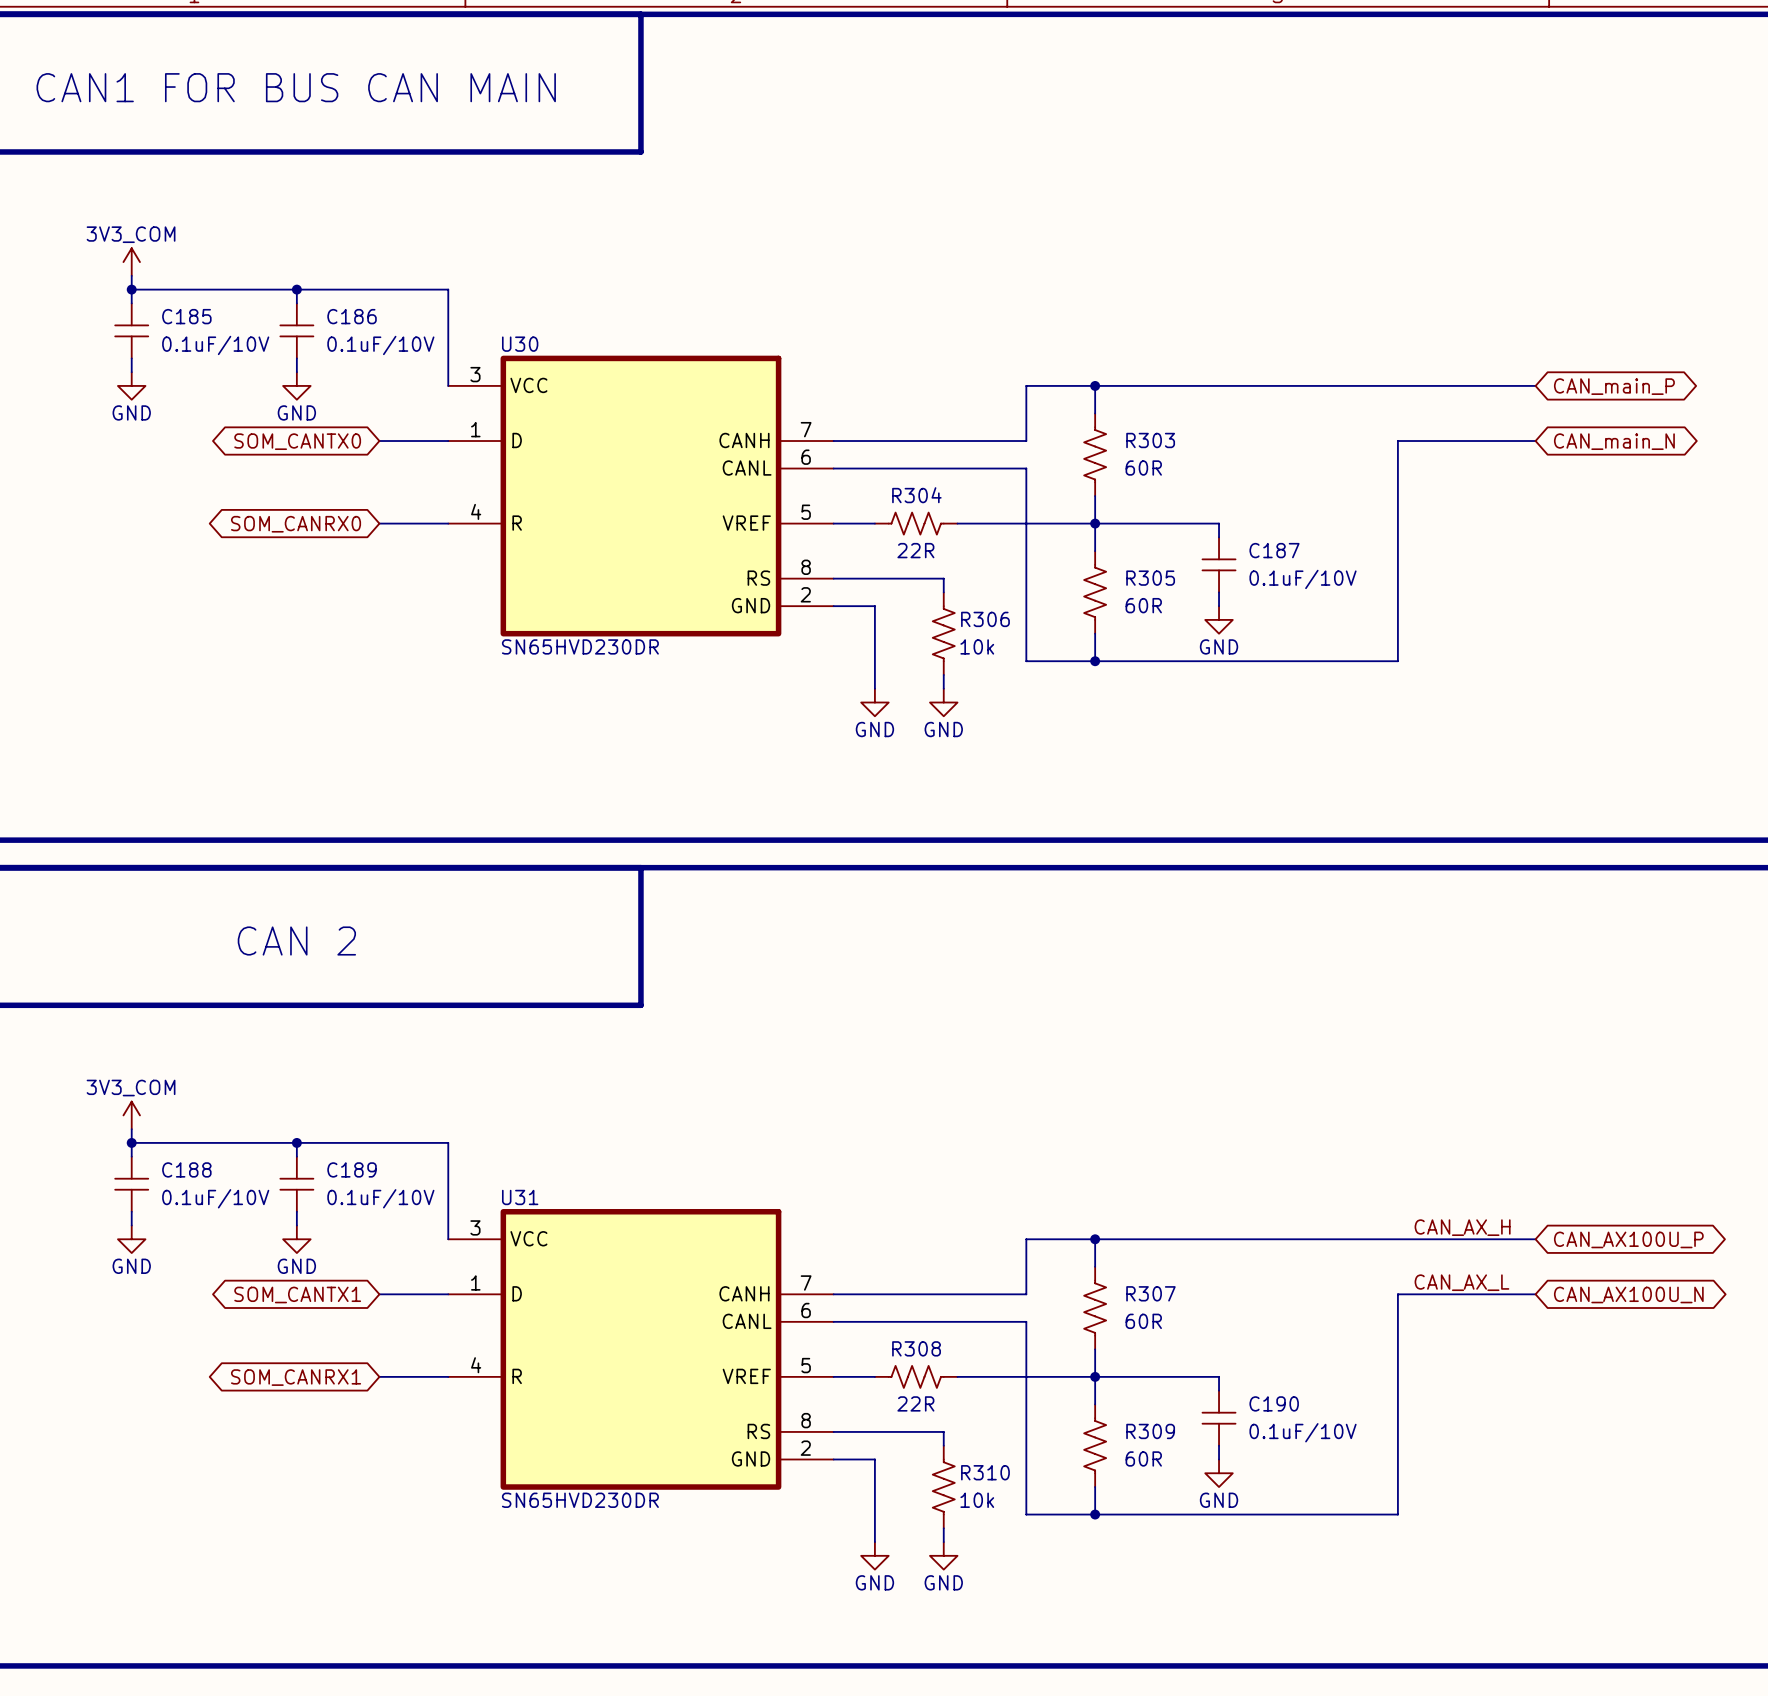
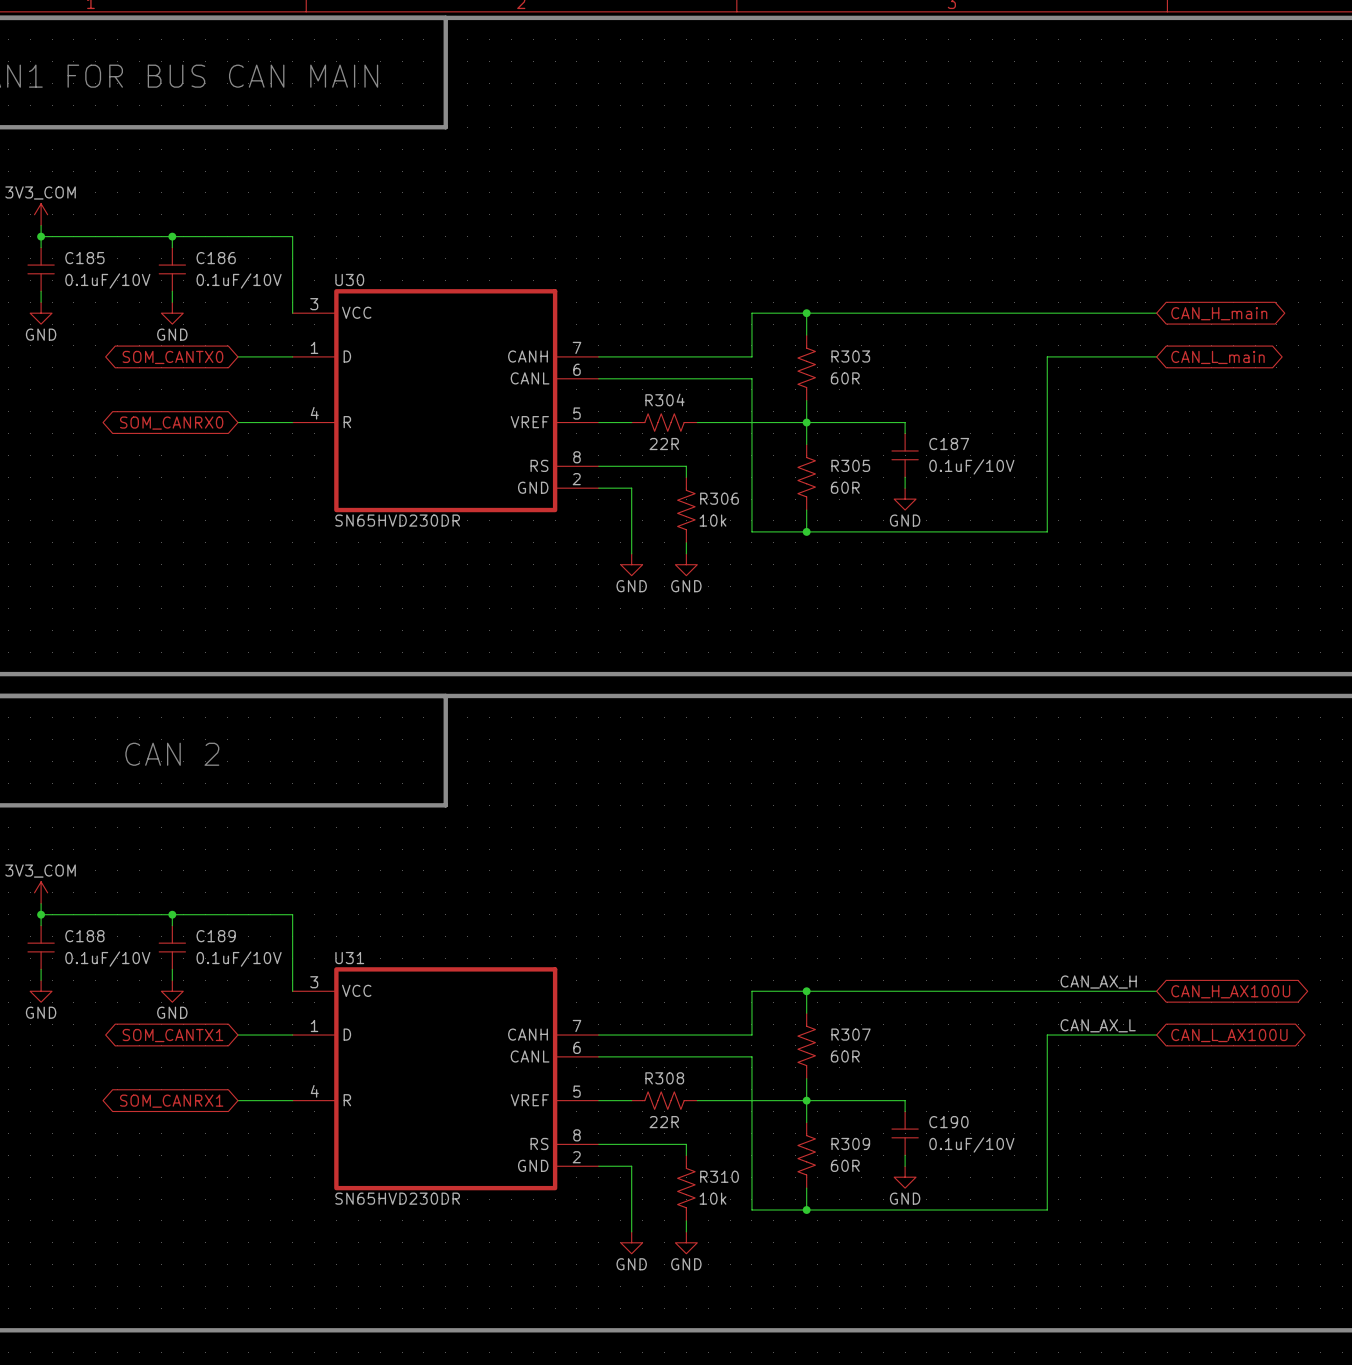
global label: CAN_main_P (1614, 386) -> CAN_H_main (1219, 313)
global label: CAN_main_N (1614, 441) -> CAN_L_main (1217, 357)
global label: CAN_AX100U_P (1628, 1239) -> CAN_H_AX100U (1230, 991)
global label: CAN_AX100U_N (1628, 1294) -> CAN_L_AX100U (1229, 1035)

